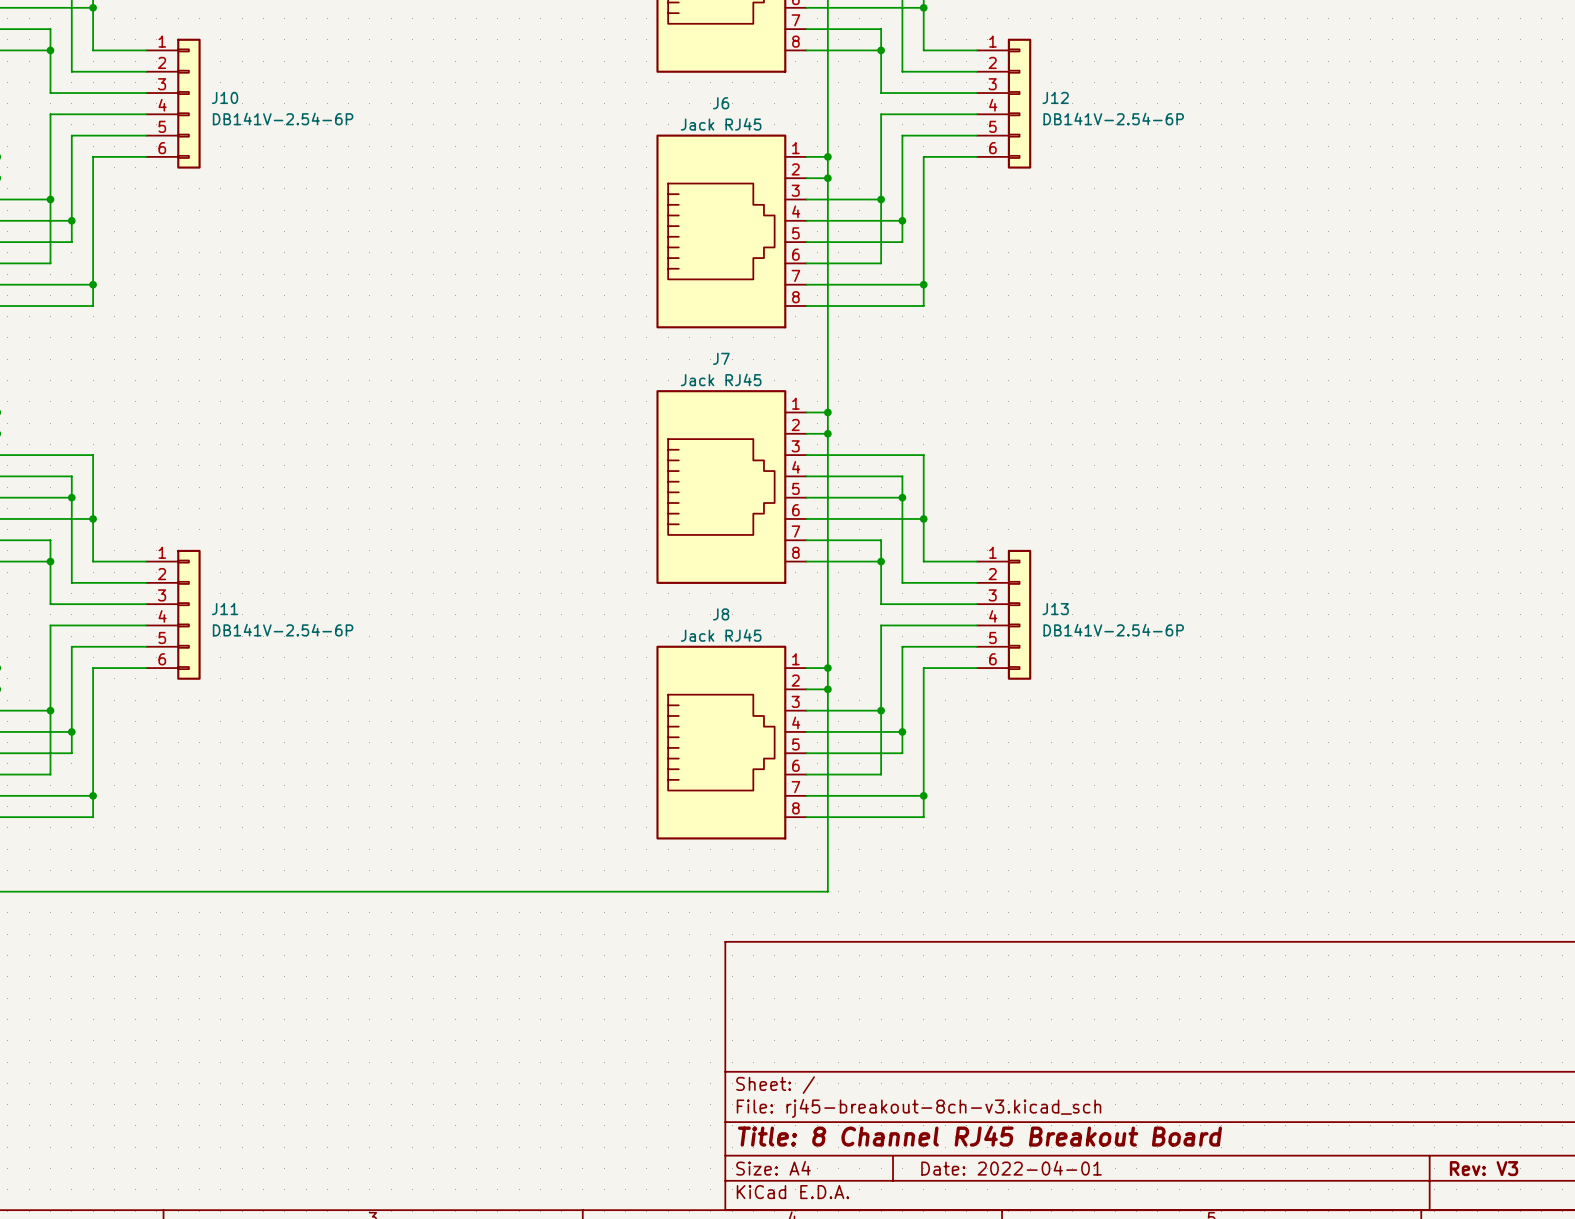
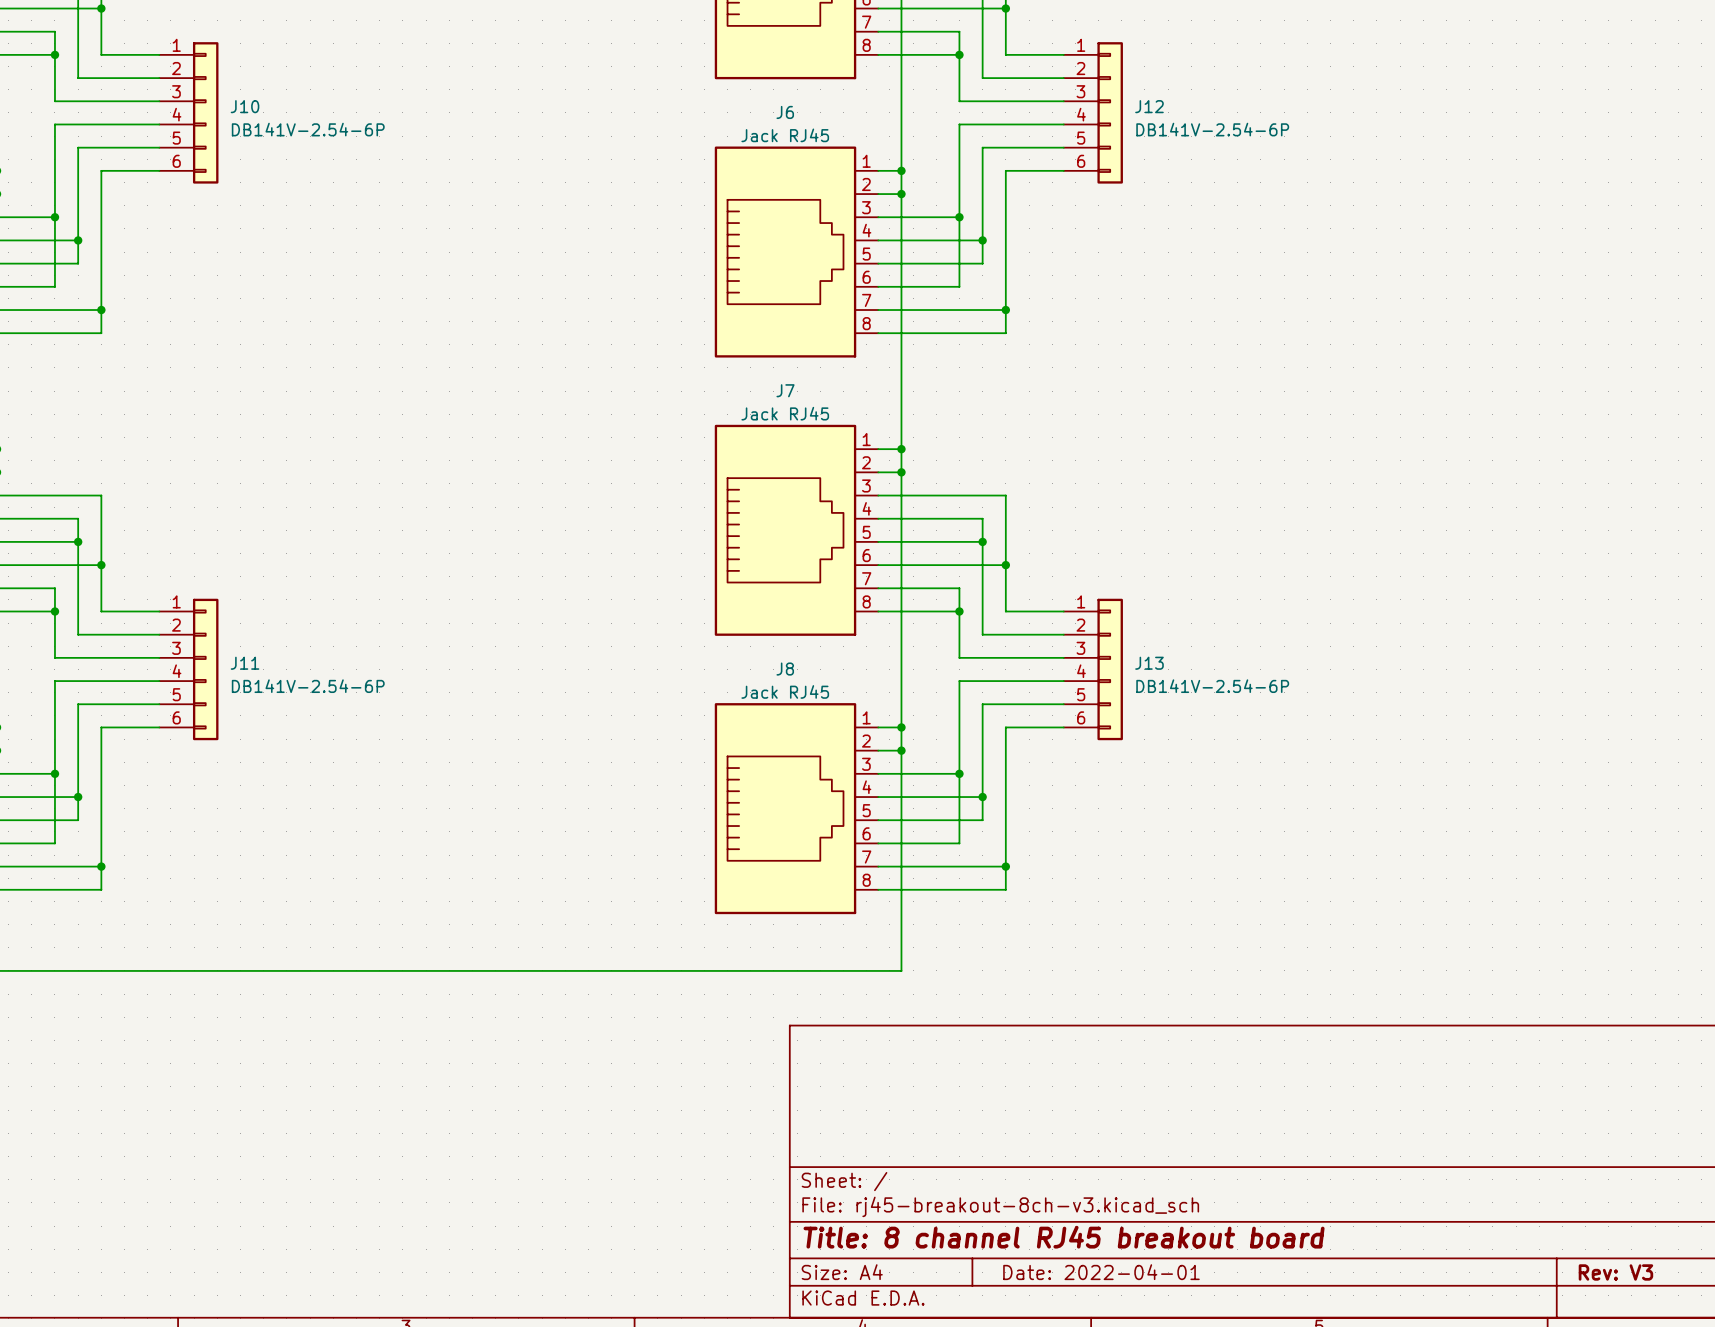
title block: Title: 8 Channel RJ45 Breakout Board (979, 1136) -> Title: 8 channel RJ45 breakout board (1064, 1237)

